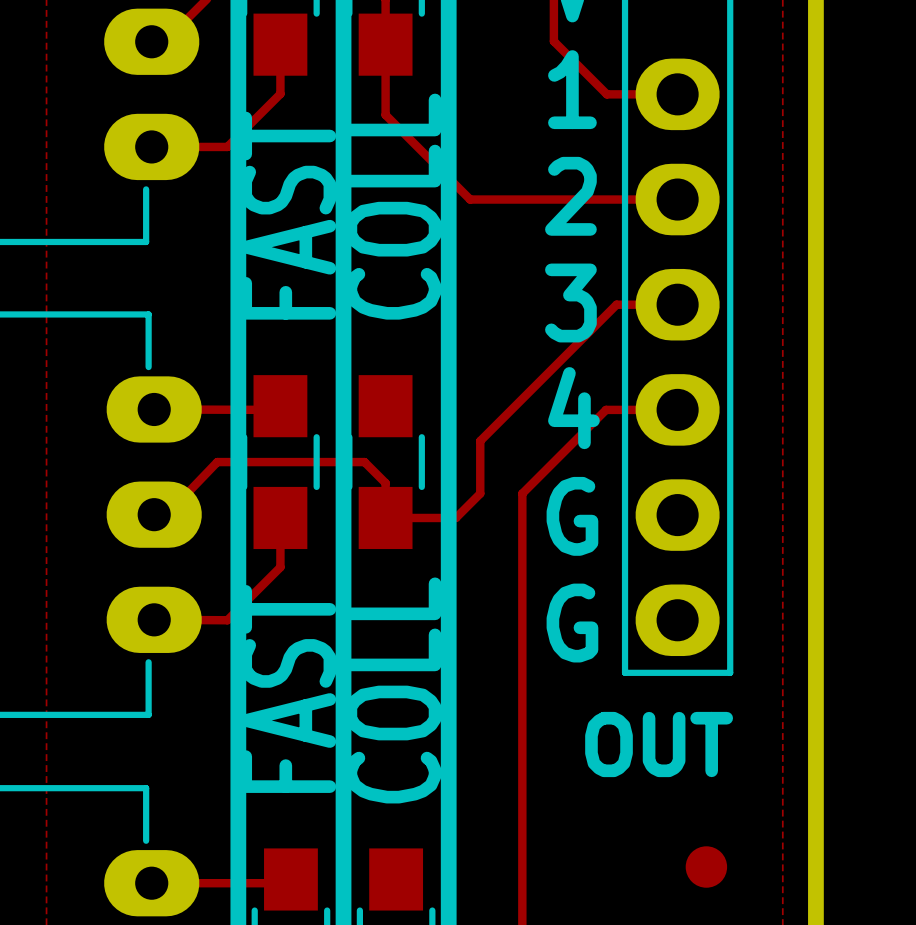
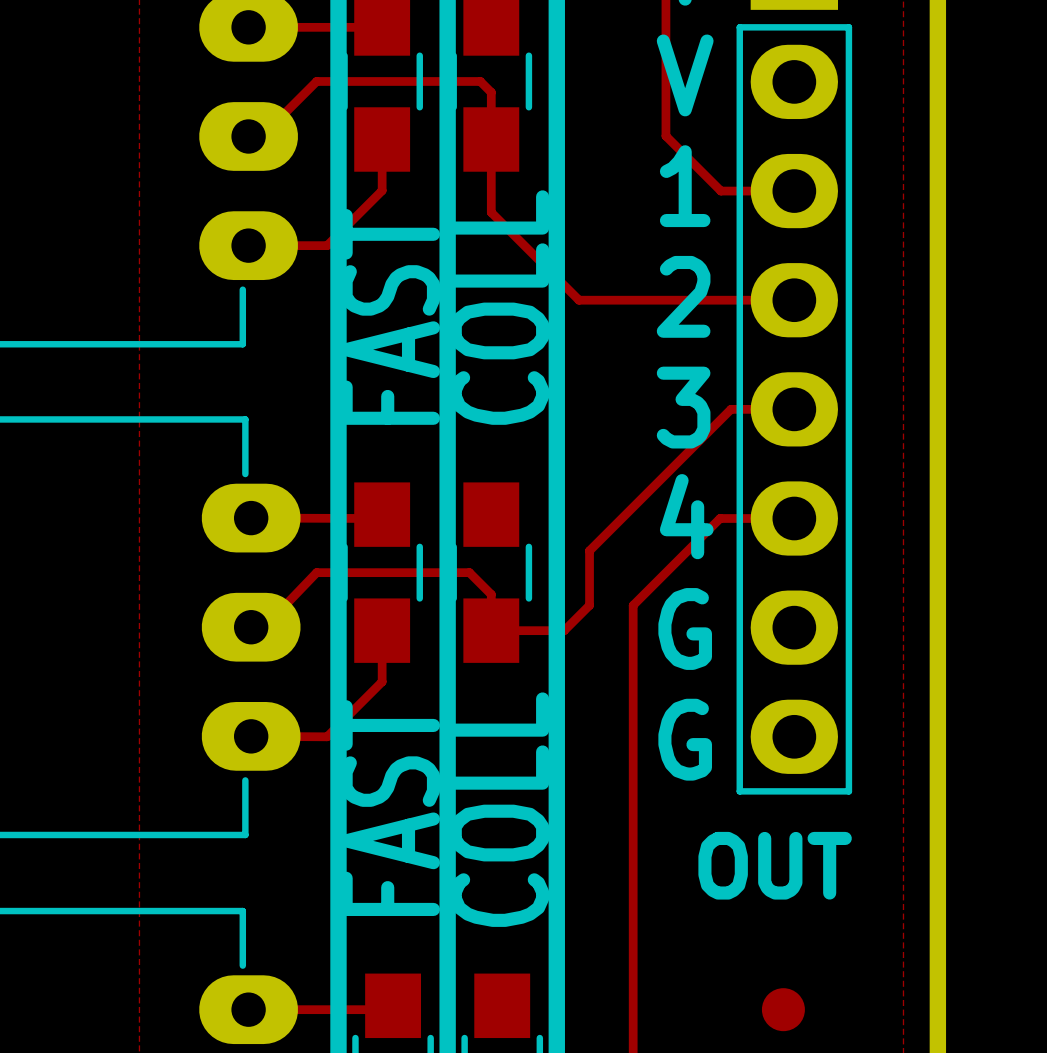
part position: (706, 867) -> (783, 1009)

